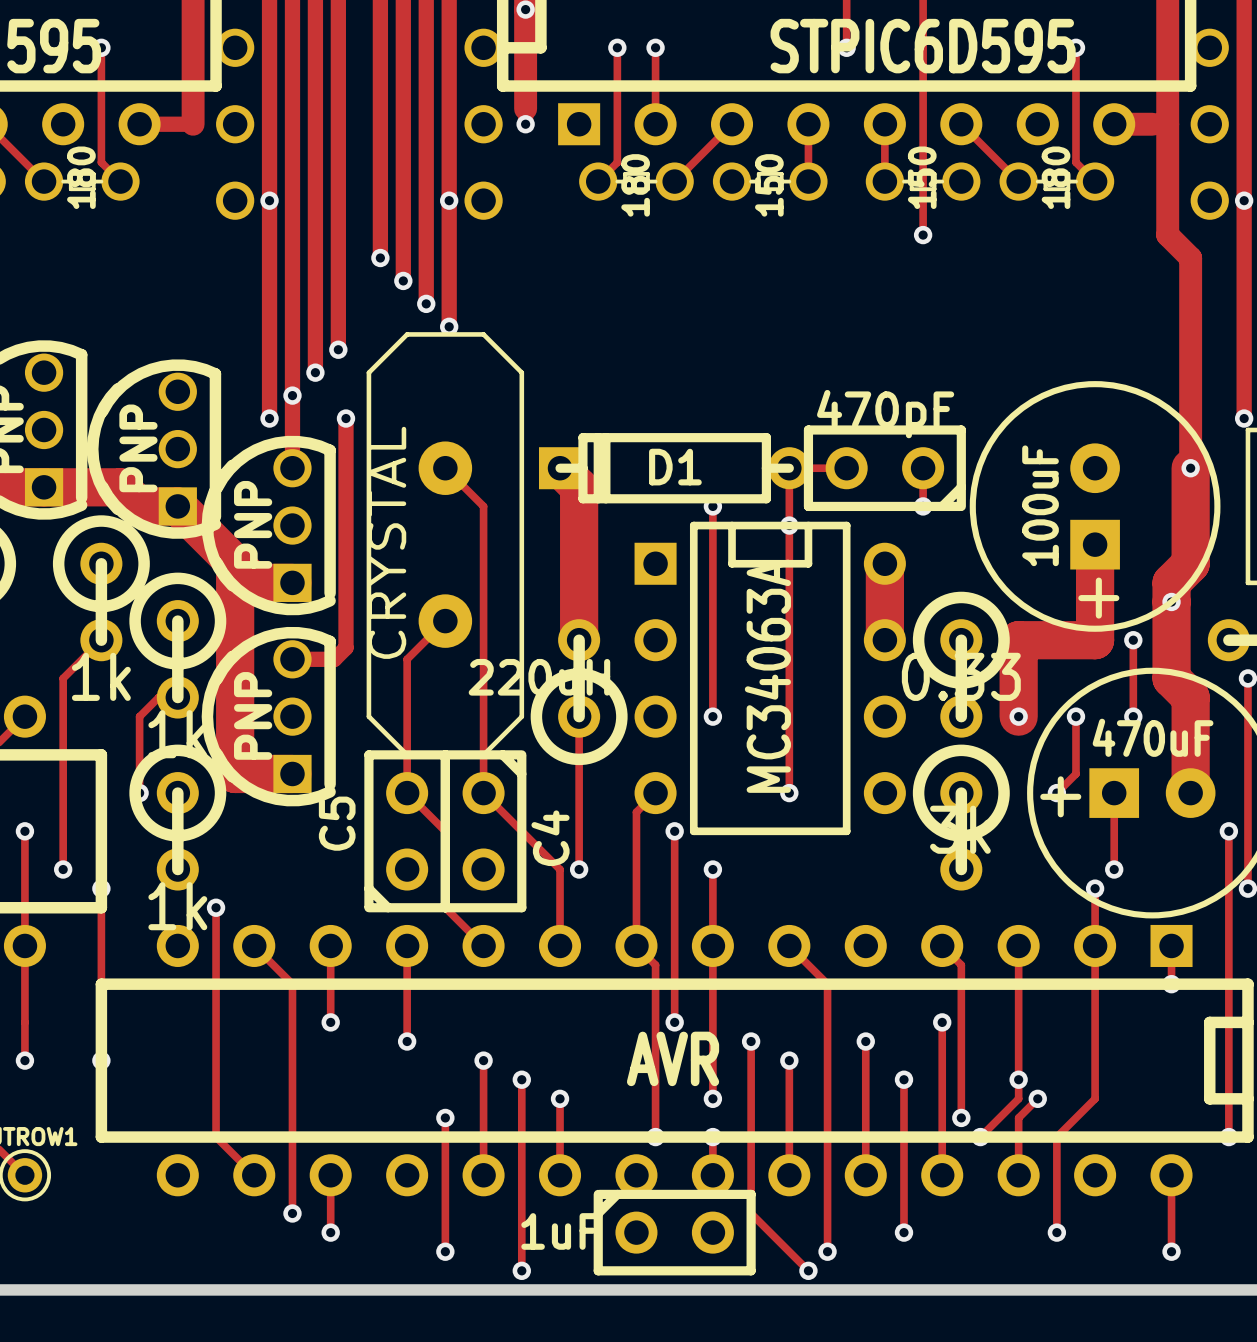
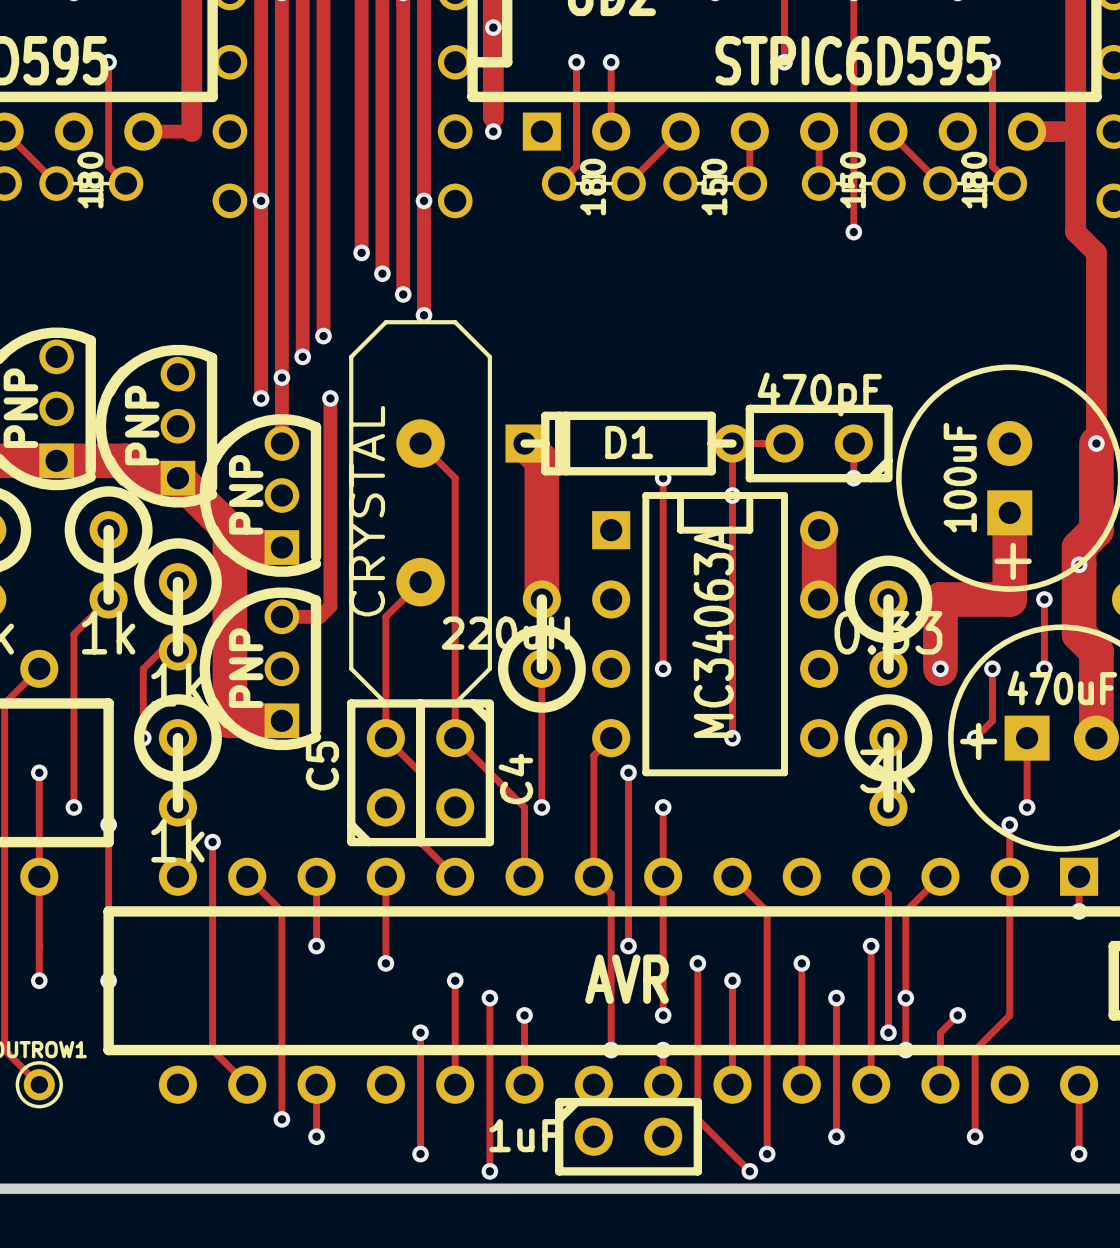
track: (1018, 945) (1018, 1098) (980, 1137) -> (940, 876) (905, 911) (905, 1050)
via position: (1018, 1079) -> (905, 998)

